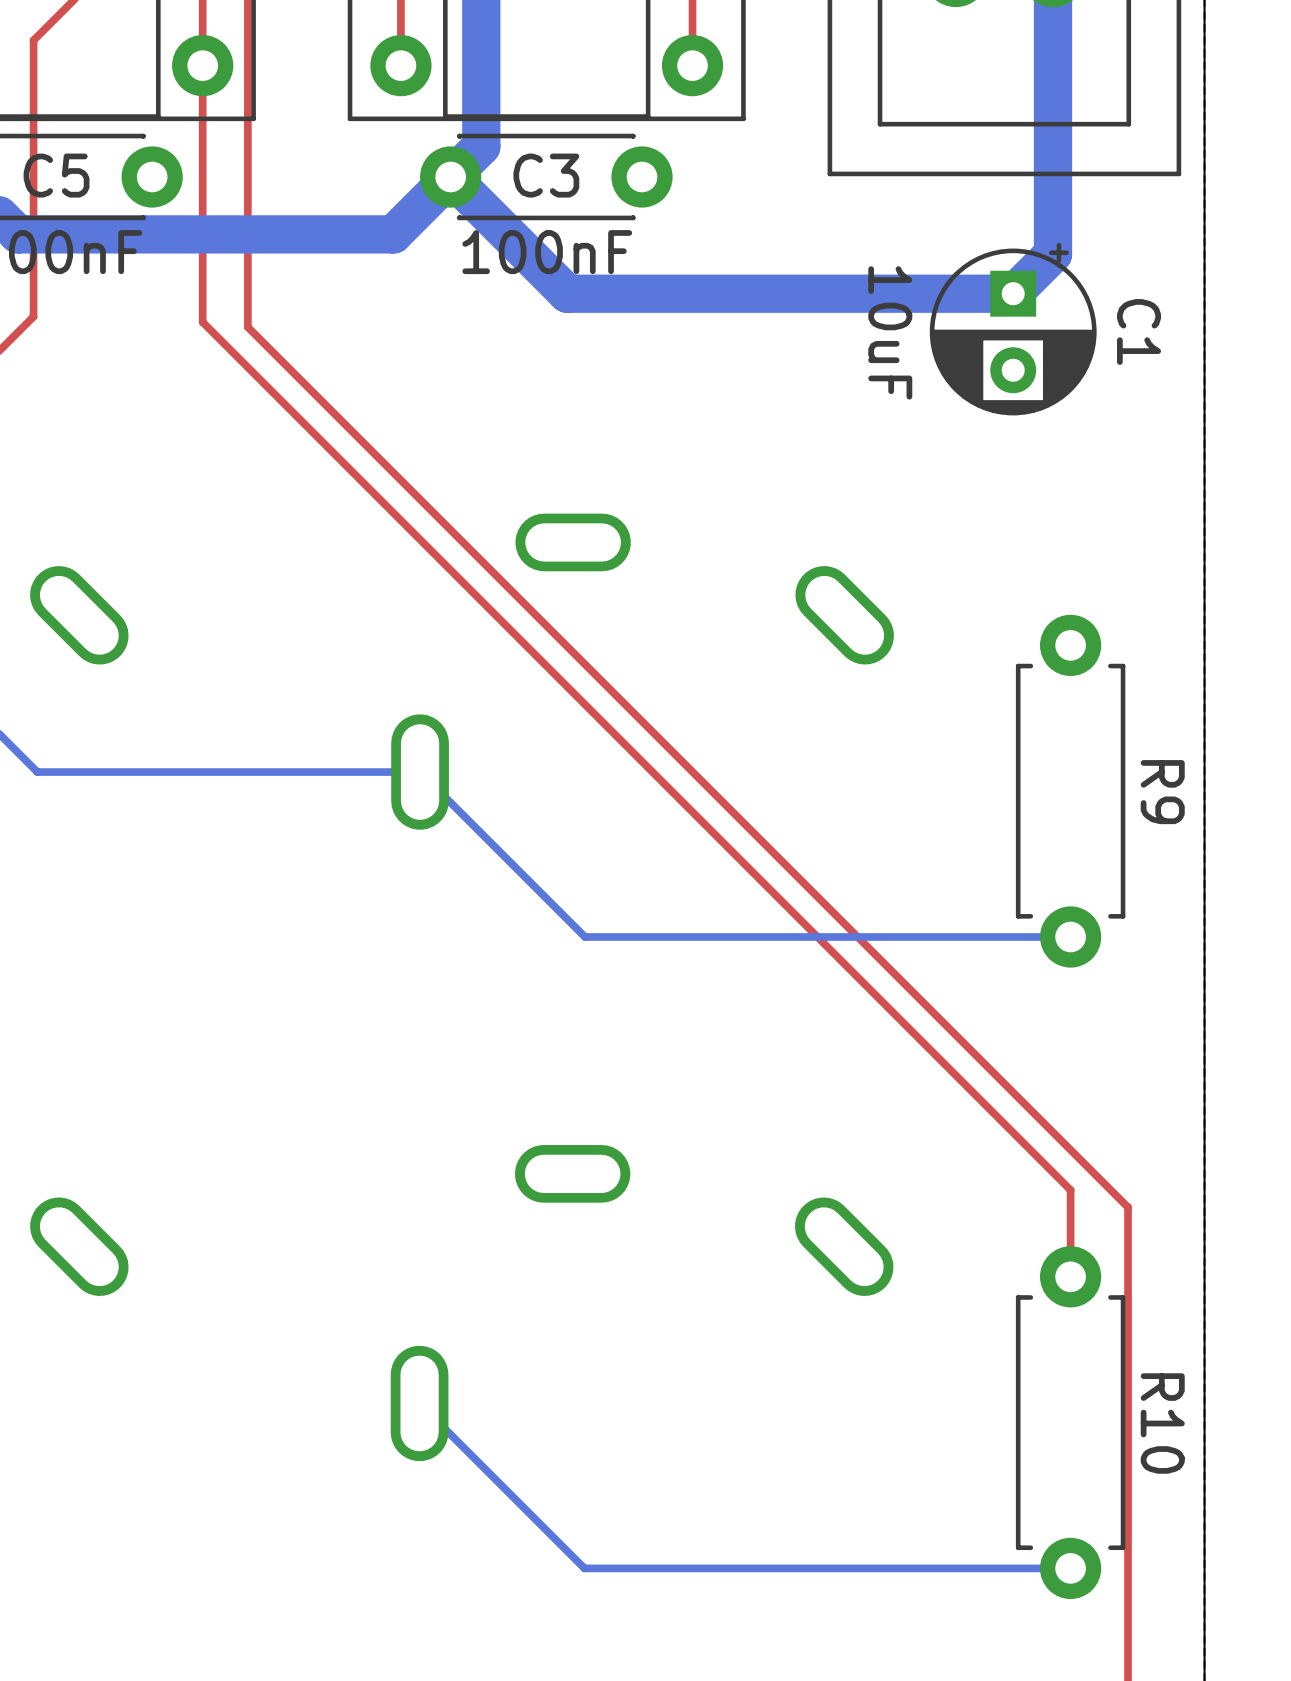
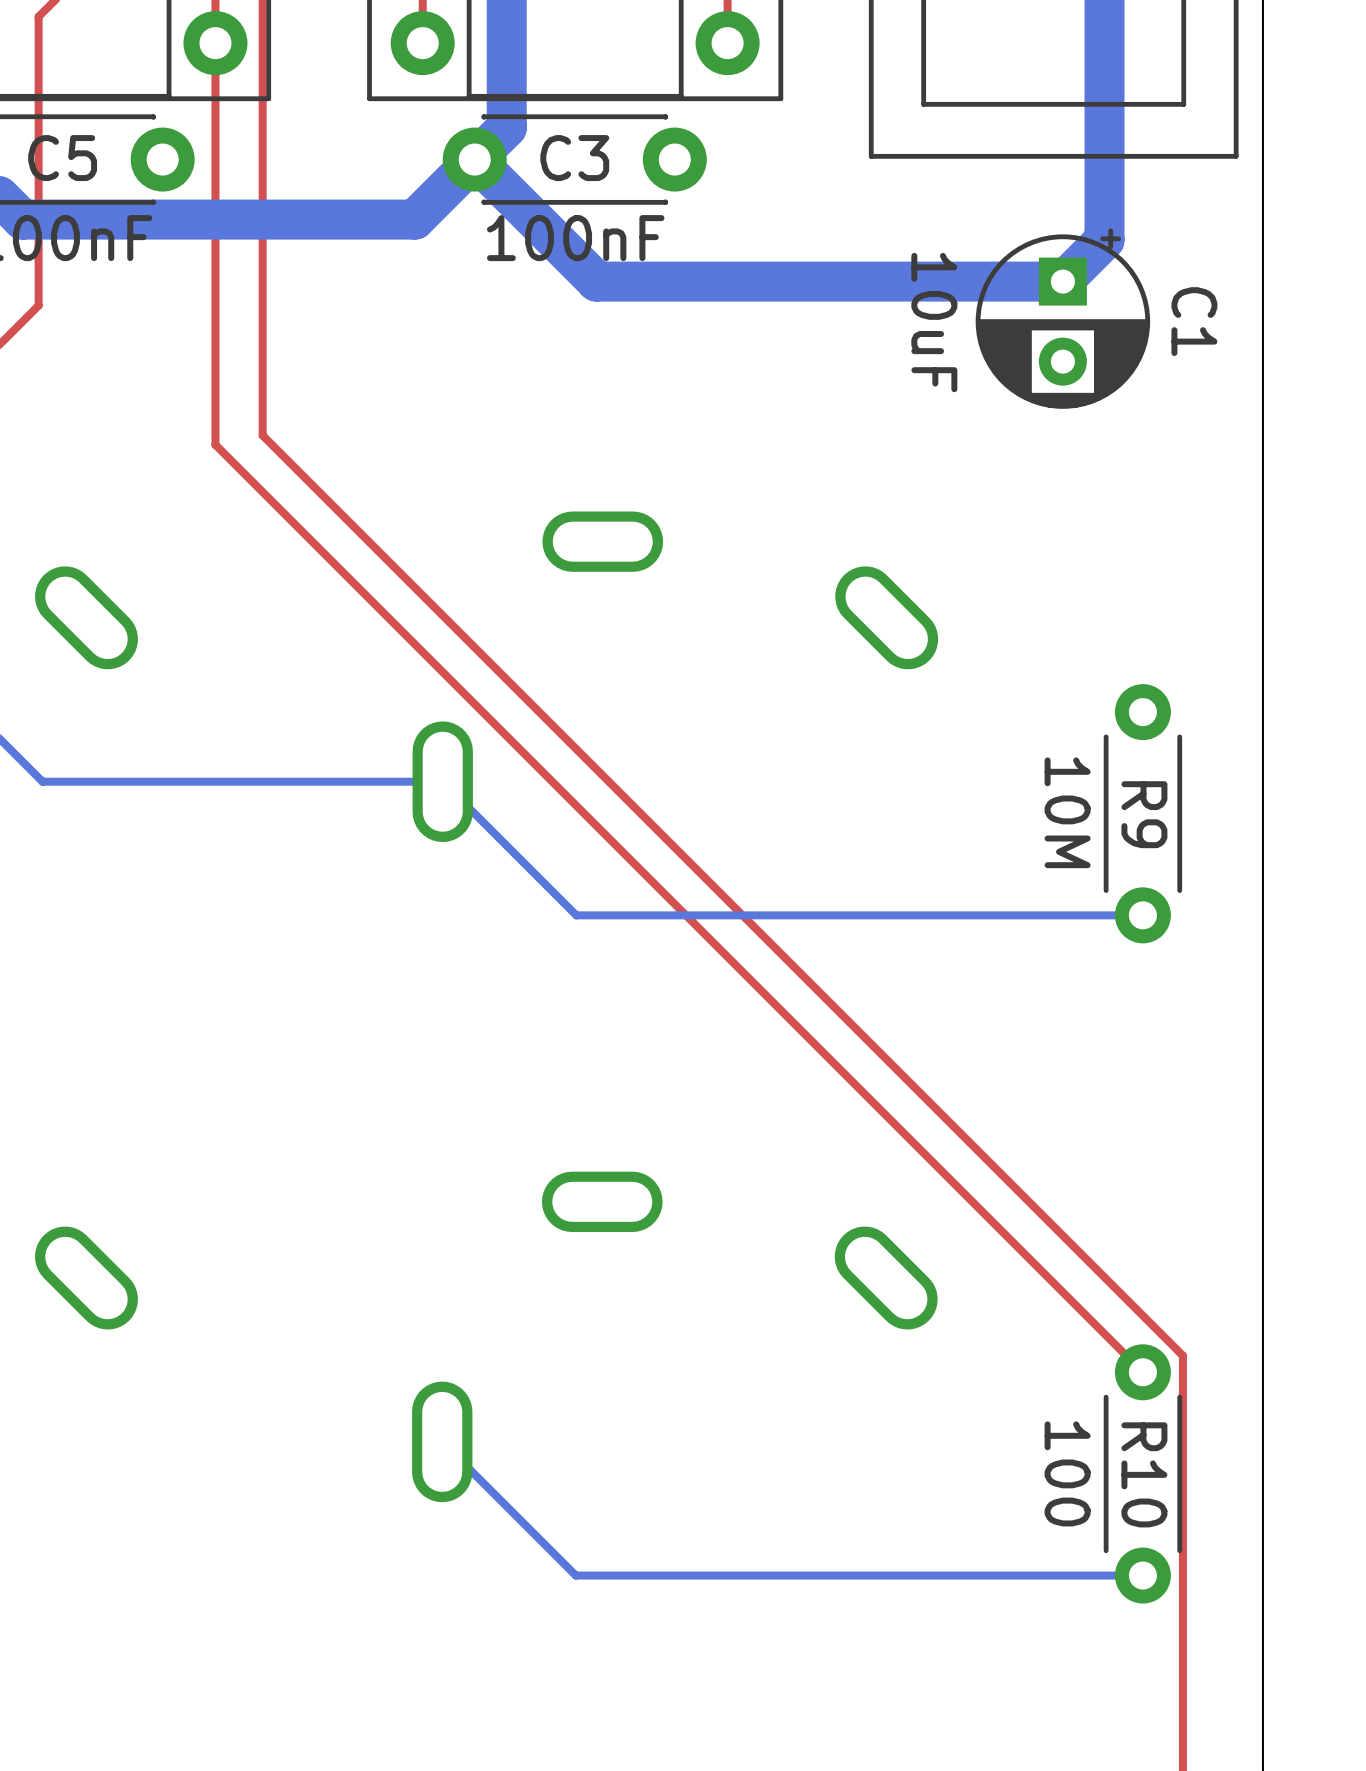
top track: (202, 322) (1070, 1190) (1070, 1276) -> (215, 311) (215, 444) (1142, 1372)
top track: (247, 327) (1128, 1207) (1128, 1321) -> (262, 316) (262, 435) (1182, 1355)
R9 footprint: [1015, 614, 1126, 968] -> [1103, 684, 1183, 944]
R9 name position: R9 (1162, 792) -> R9 (1144, 814)
R9 value: none -> 10M (1067, 812)
bottom track: (547, 899) (584, 936) (1070, 936) -> (576, 915) (1142, 915)
R10 footprint: [1015, 1246, 1126, 1600] -> [1103, 1344, 1183, 1604]
R10 name position: R10 (1162, 1423) -> R10 (1144, 1474)
R10 value: none -> 100 (1067, 1473)
bottom track: (547, 1531) (584, 1568) (1070, 1568) -> (575, 1575) (1142, 1575)

